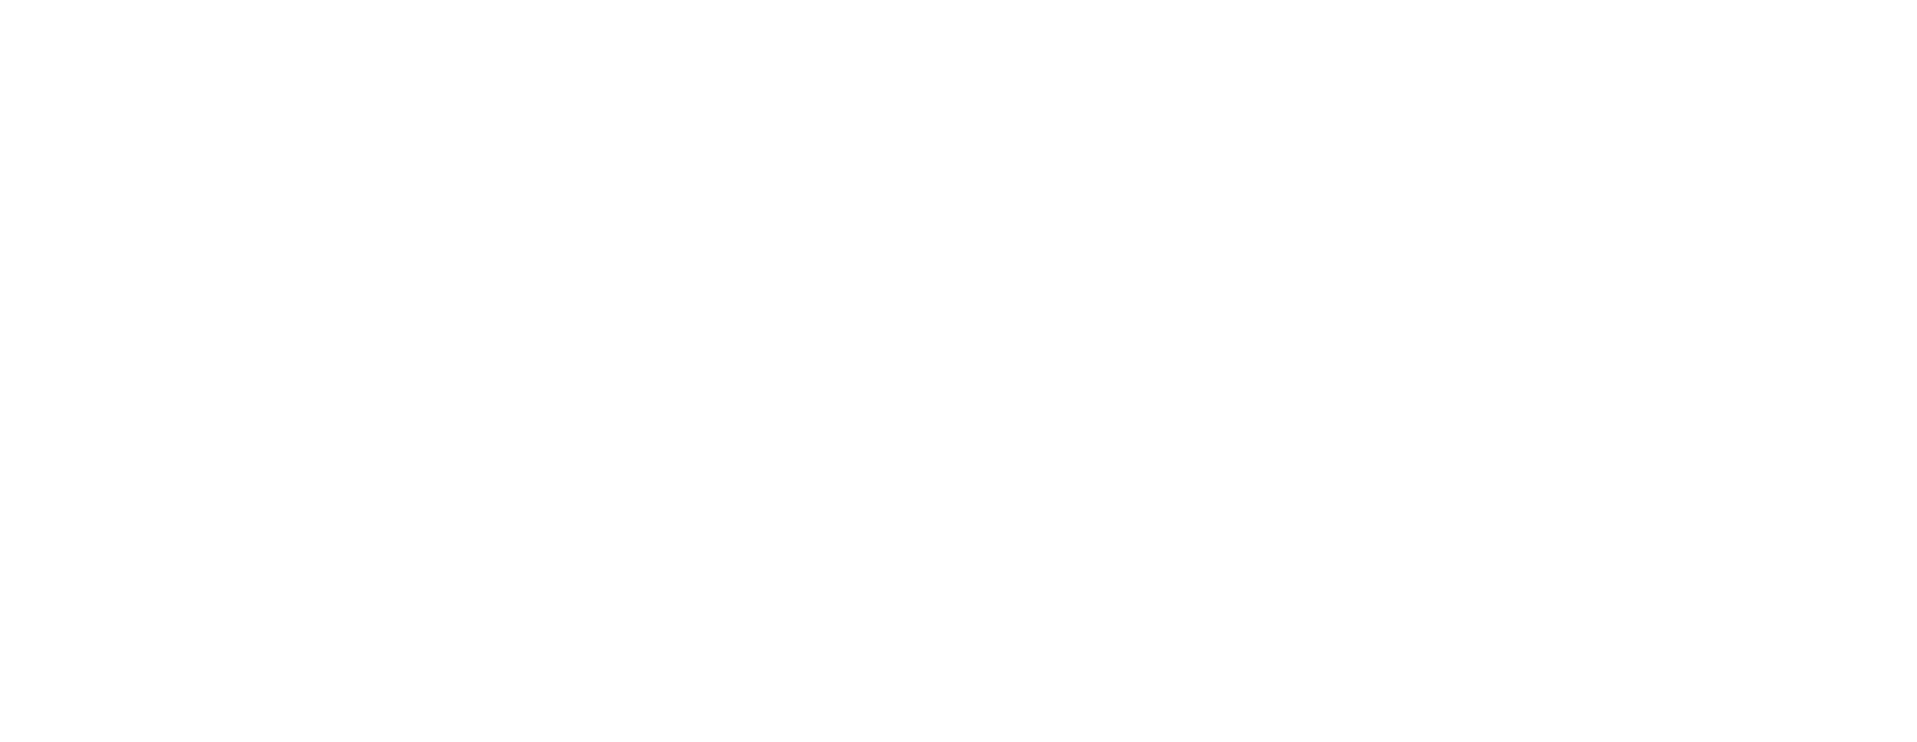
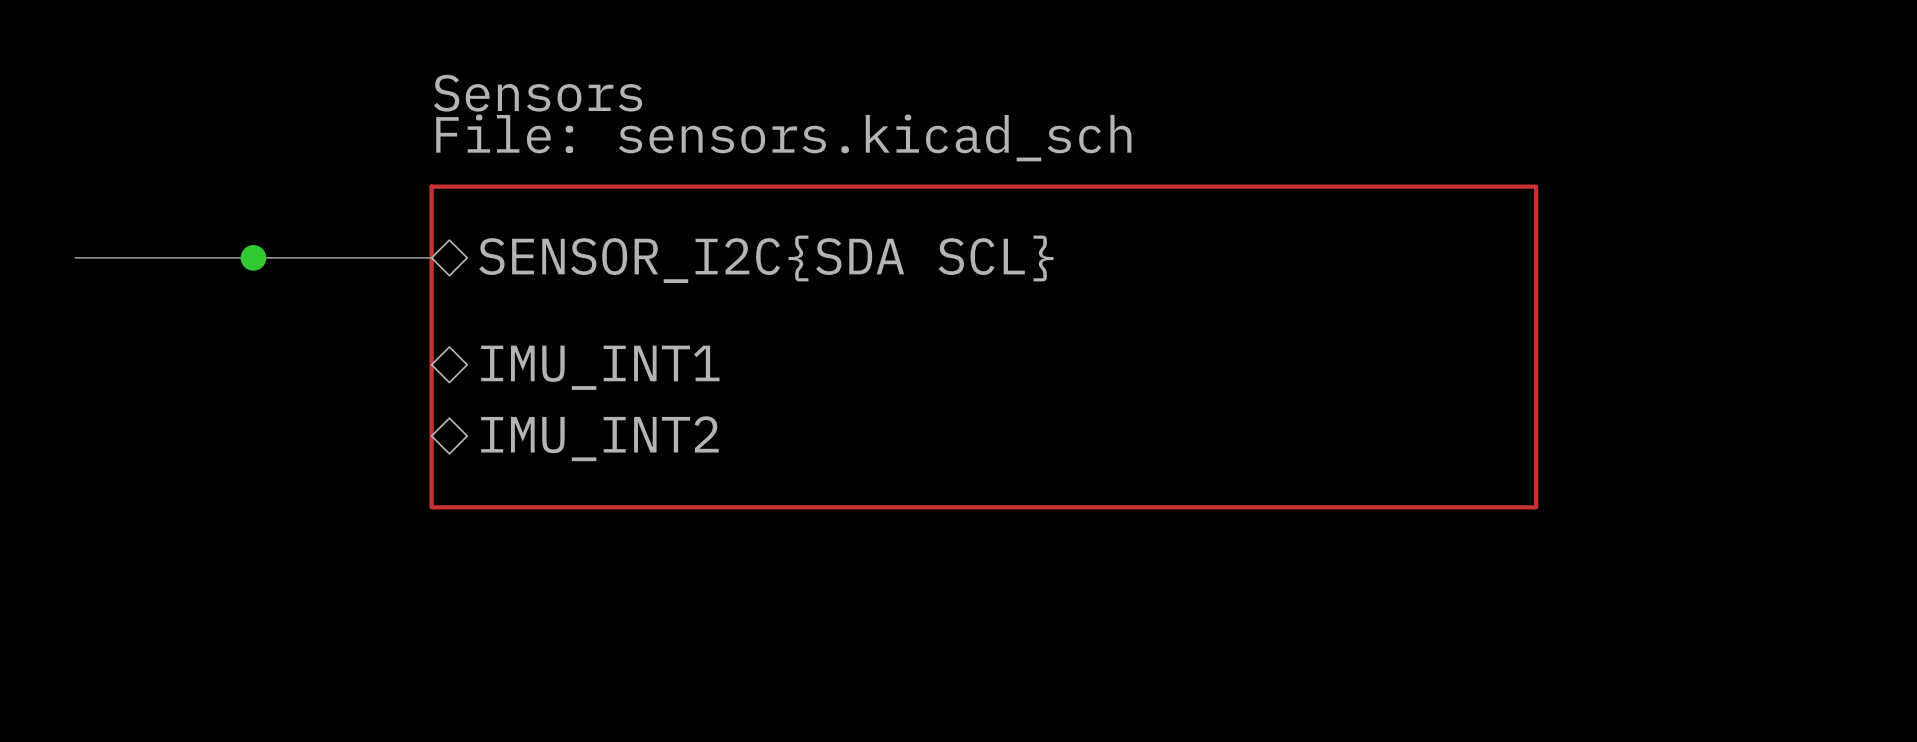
bus: none -> (75, 257) (431, 257)
junction: none -> (253, 257)
sheet pin: none -> SENSOR_I2C{SDA SCL} (766, 259)
sheet Sensors: none -> File: sensors.kicad_sch (983, 346)
sheet pin: none -> IMU_INT1 (600, 367)
sheet pin: none -> IMU_INT2 (599, 438)

